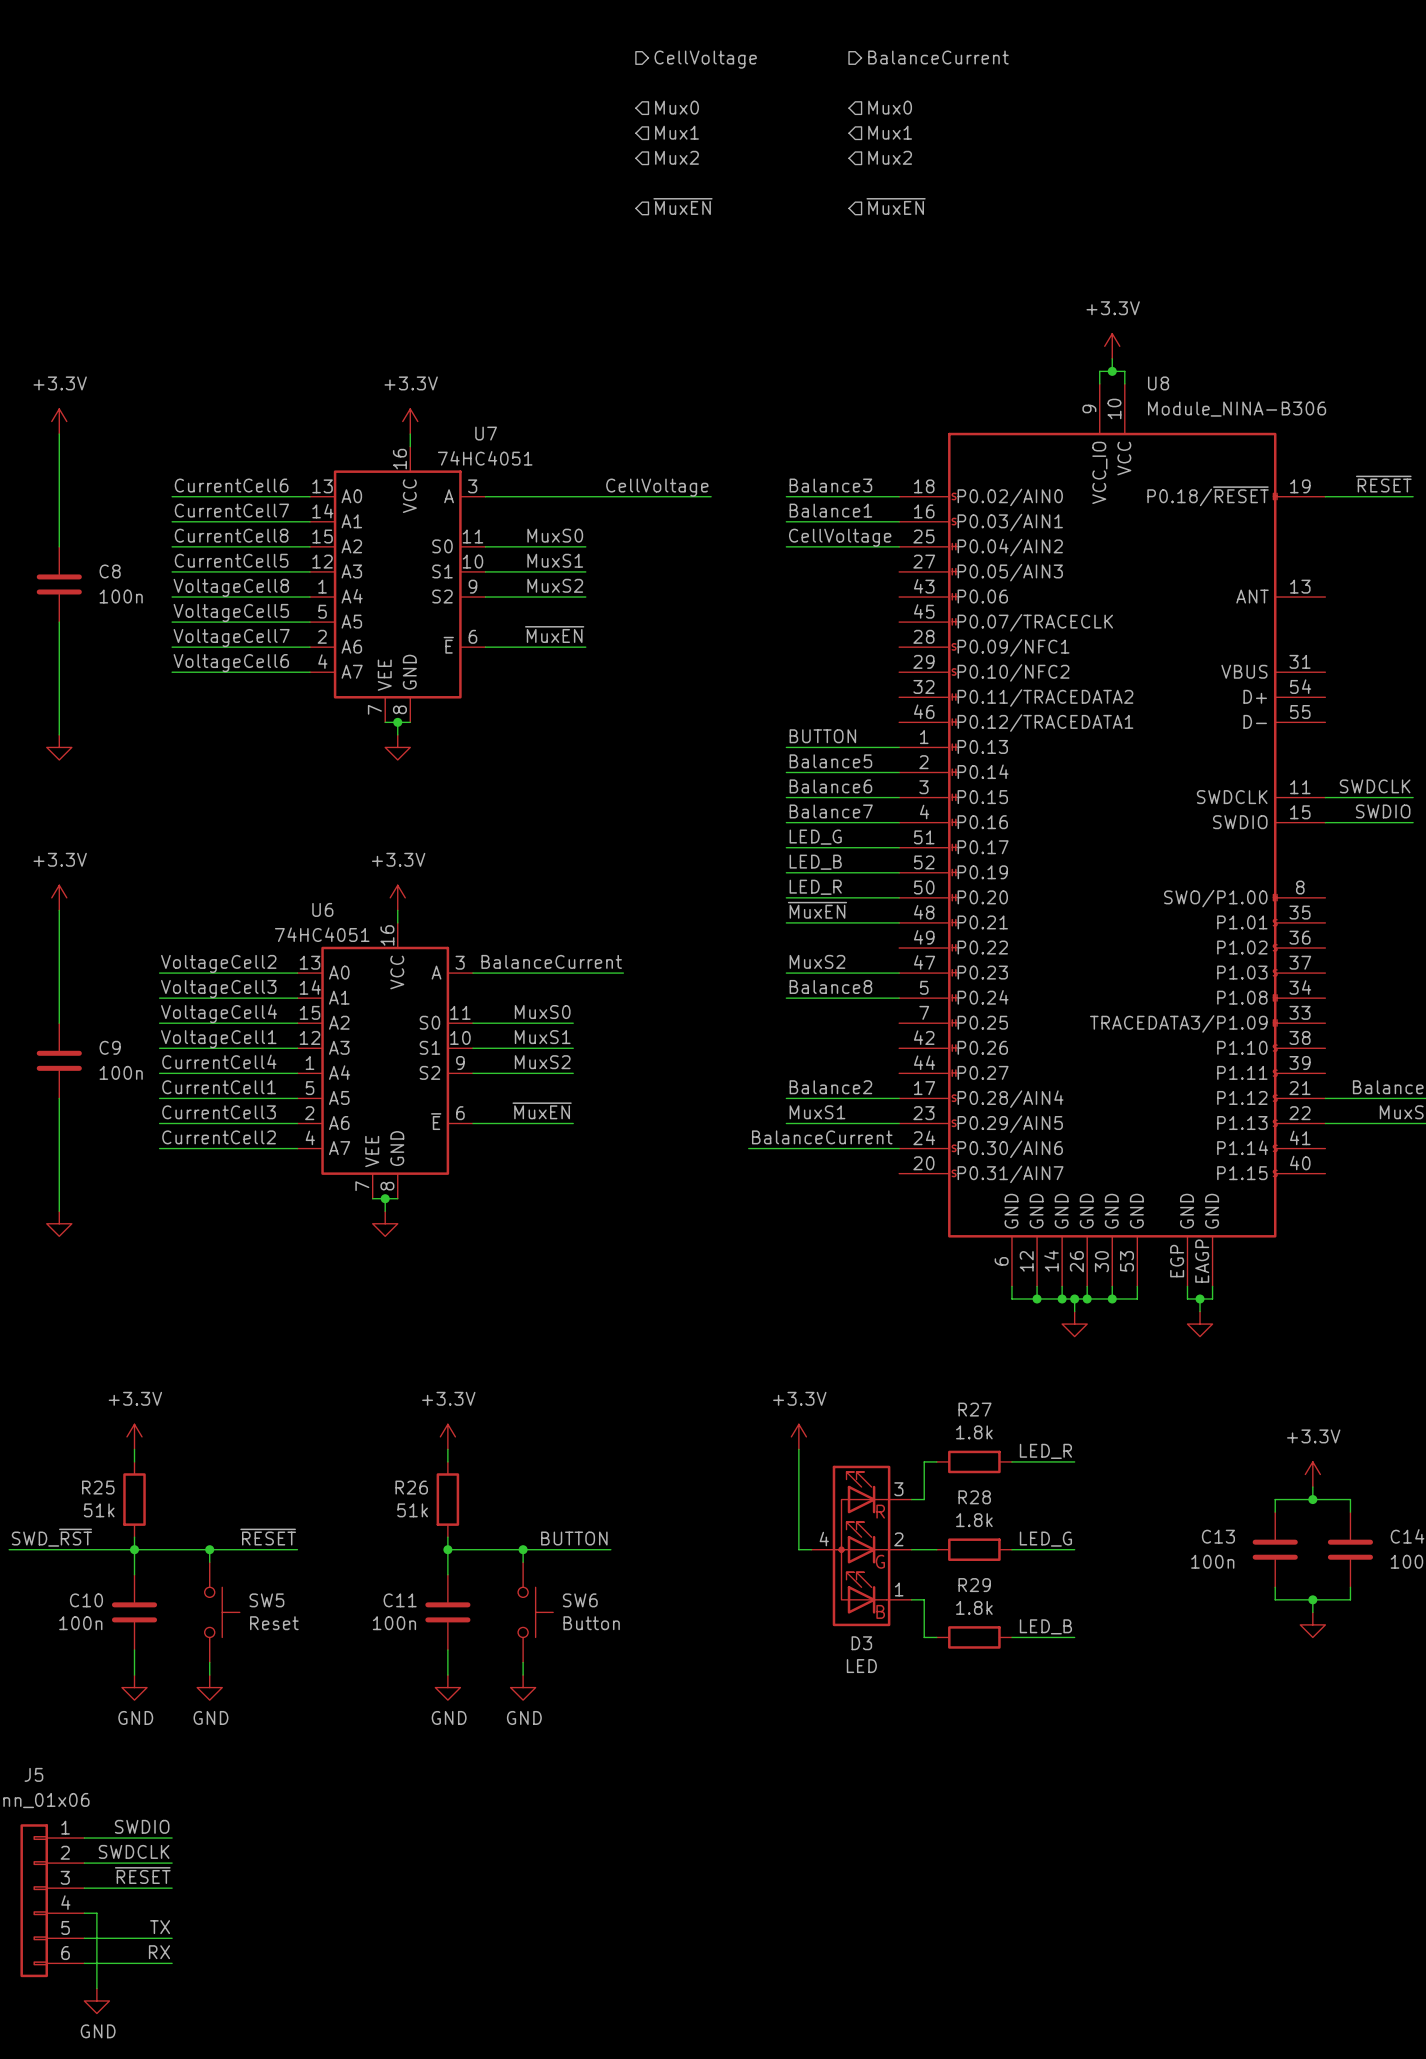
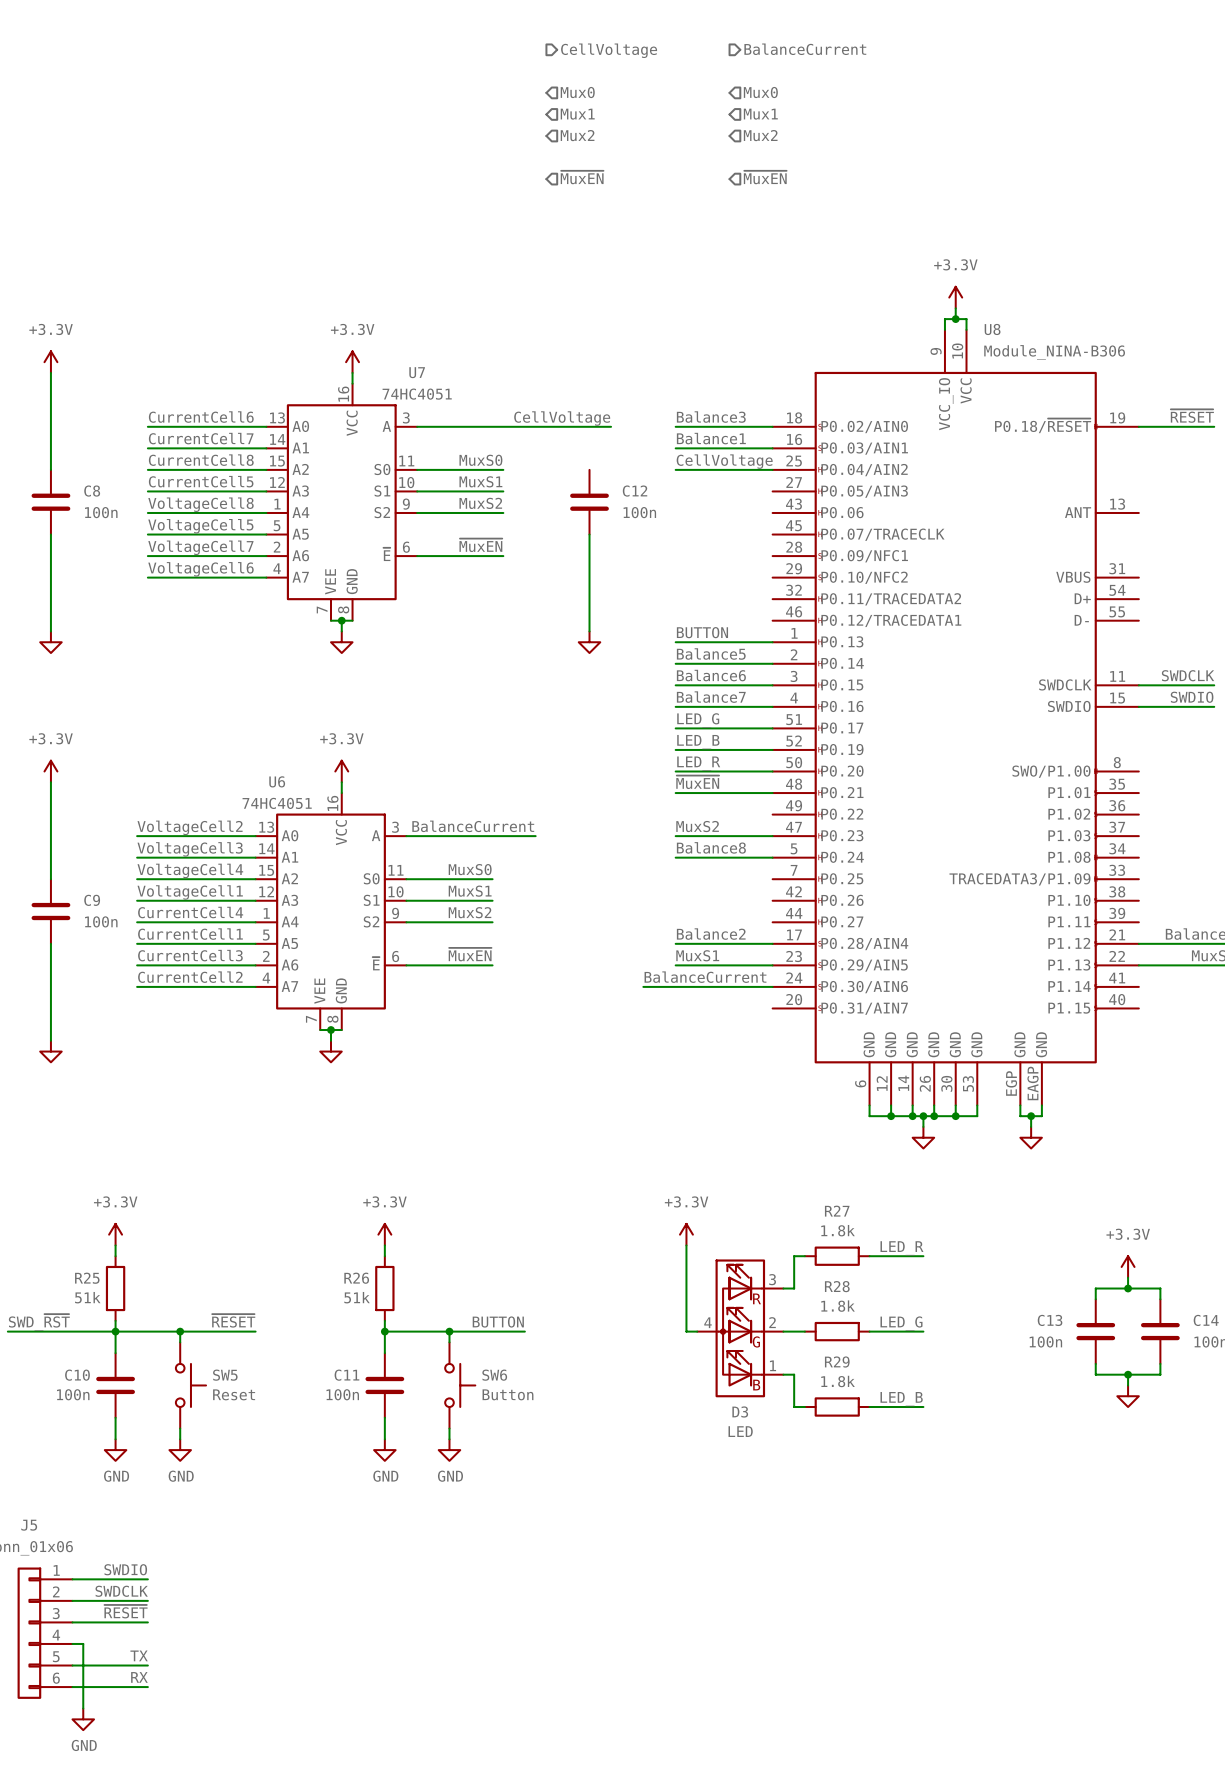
C12: none -> 100n (589, 502)
wire: none -> (589, 534) (589, 631)
power symbol: none -> (589, 642)

